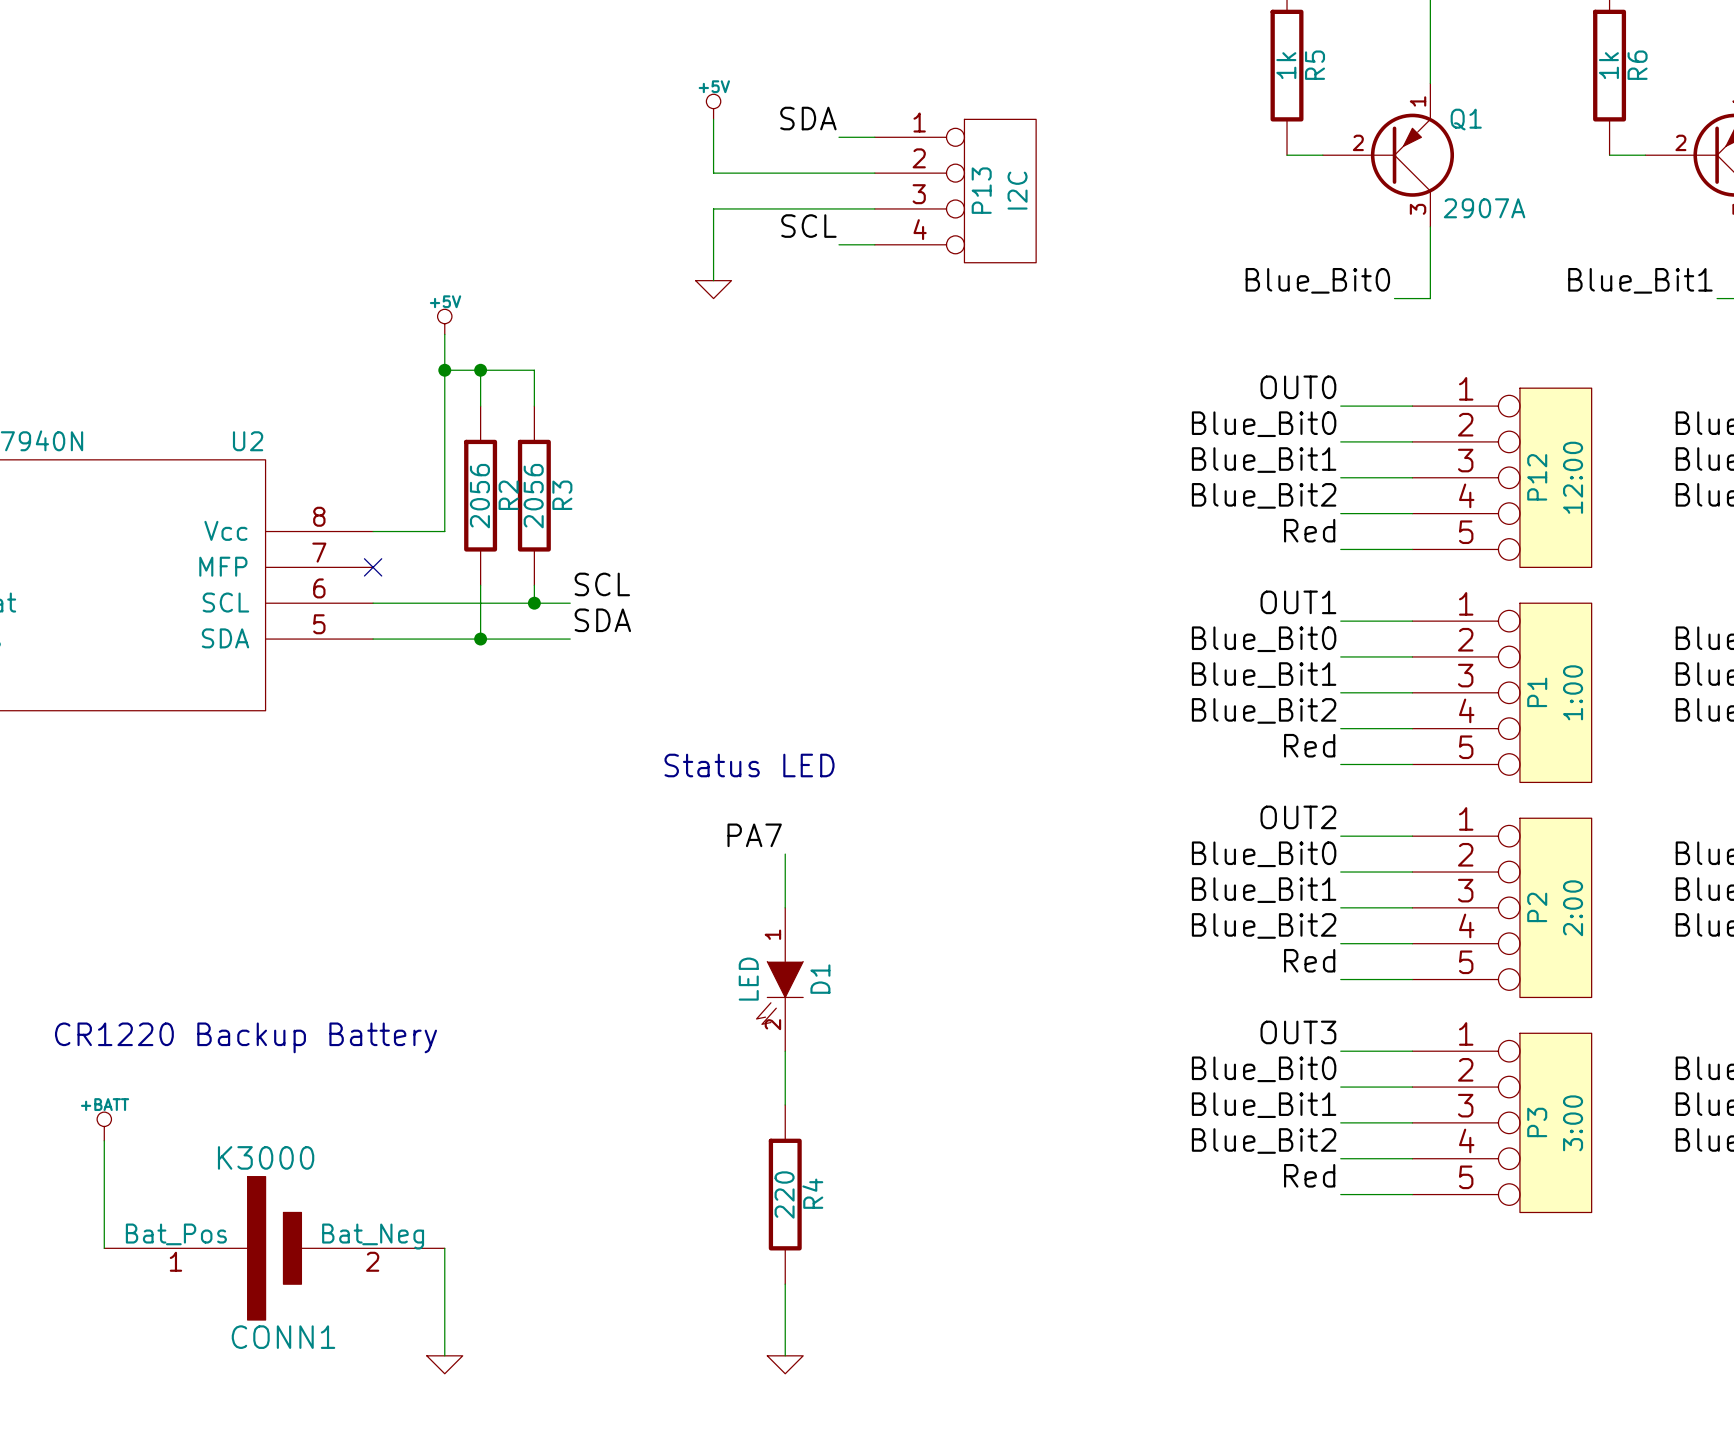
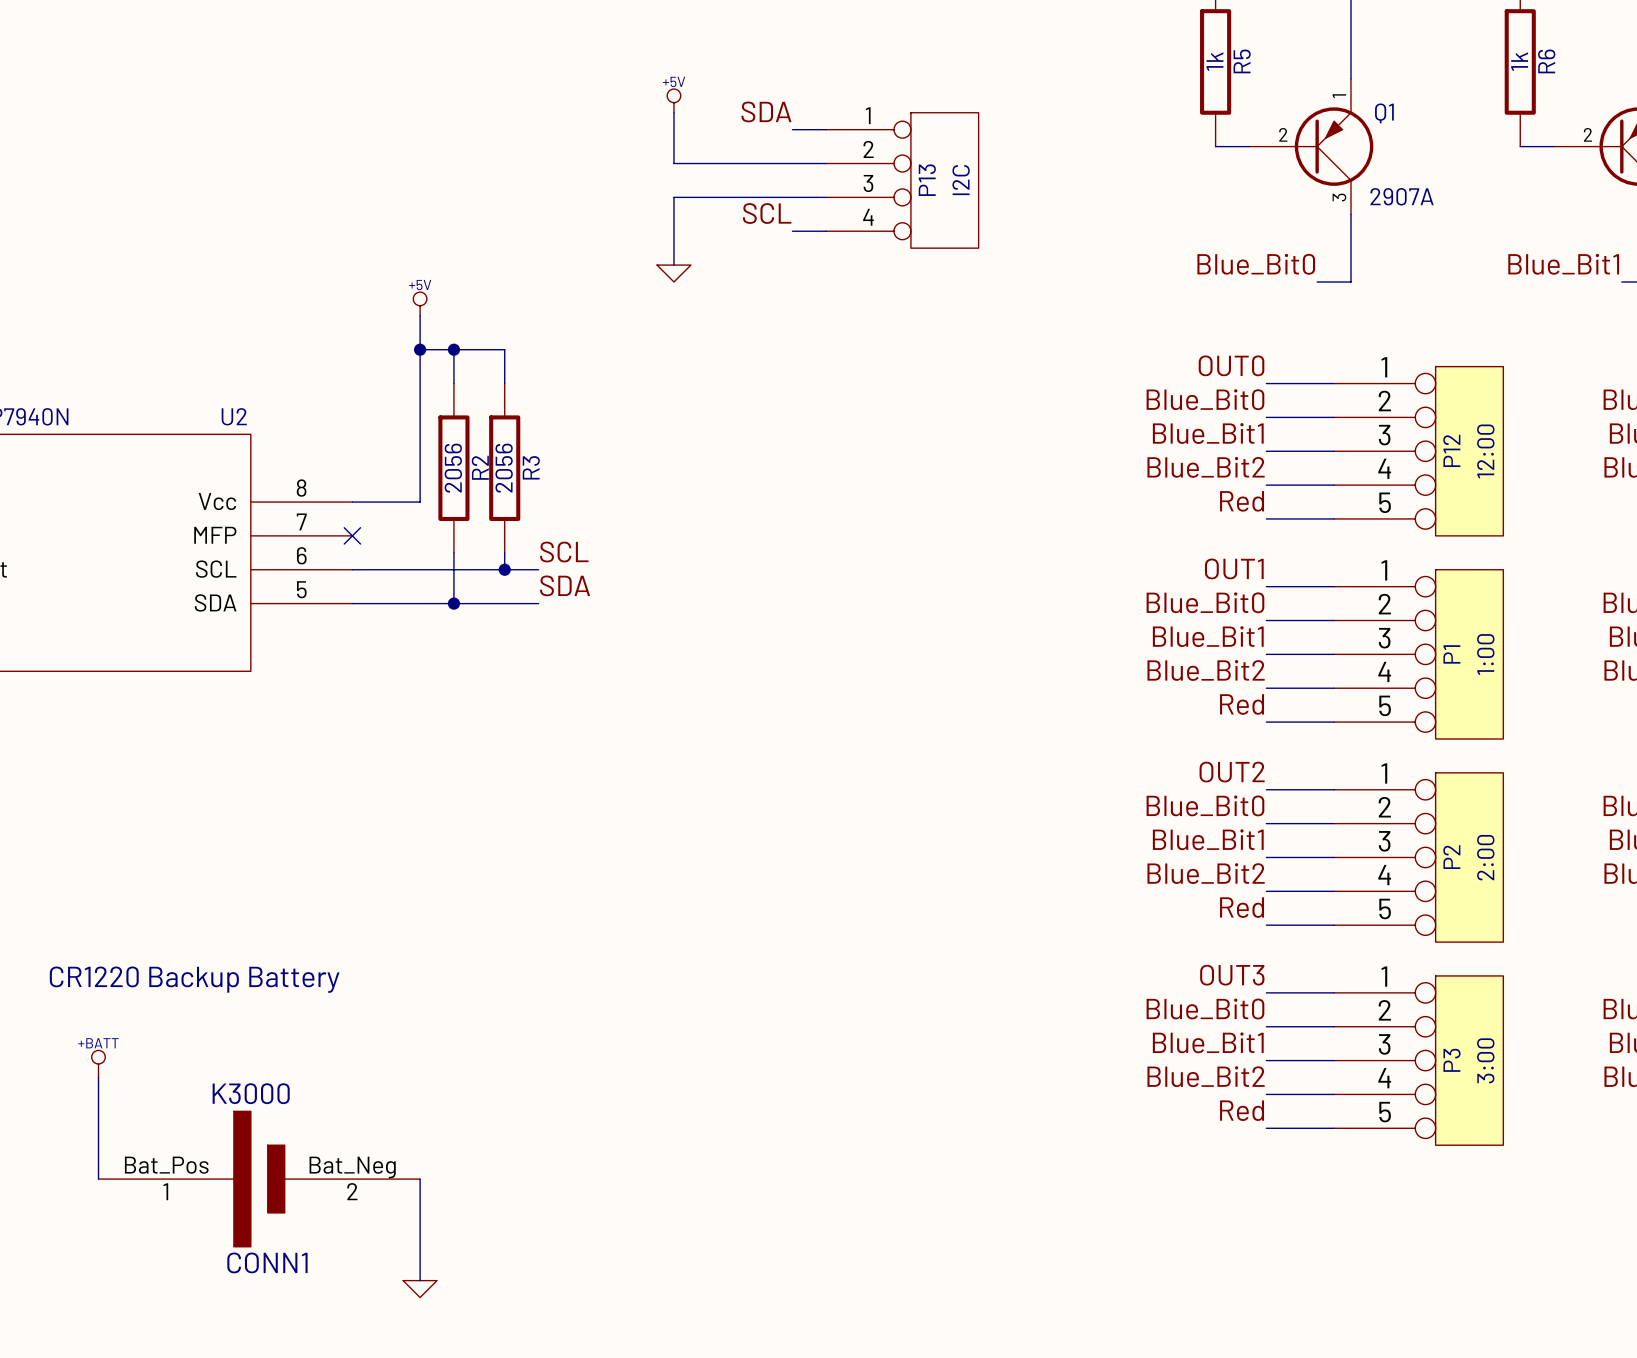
text: Status LED (749, 765) -> none
label: PA7 (754, 835) -> none
wire: (785, 854) (785, 907) -> none
D1: LED (779, 979) -> none
wire: (785, 1051) (785, 1104) -> none
R4: 220 (785, 1194) -> none
wire: (785, 1284) (785, 1355) -> none
power symbol: (785, 1364) -> none

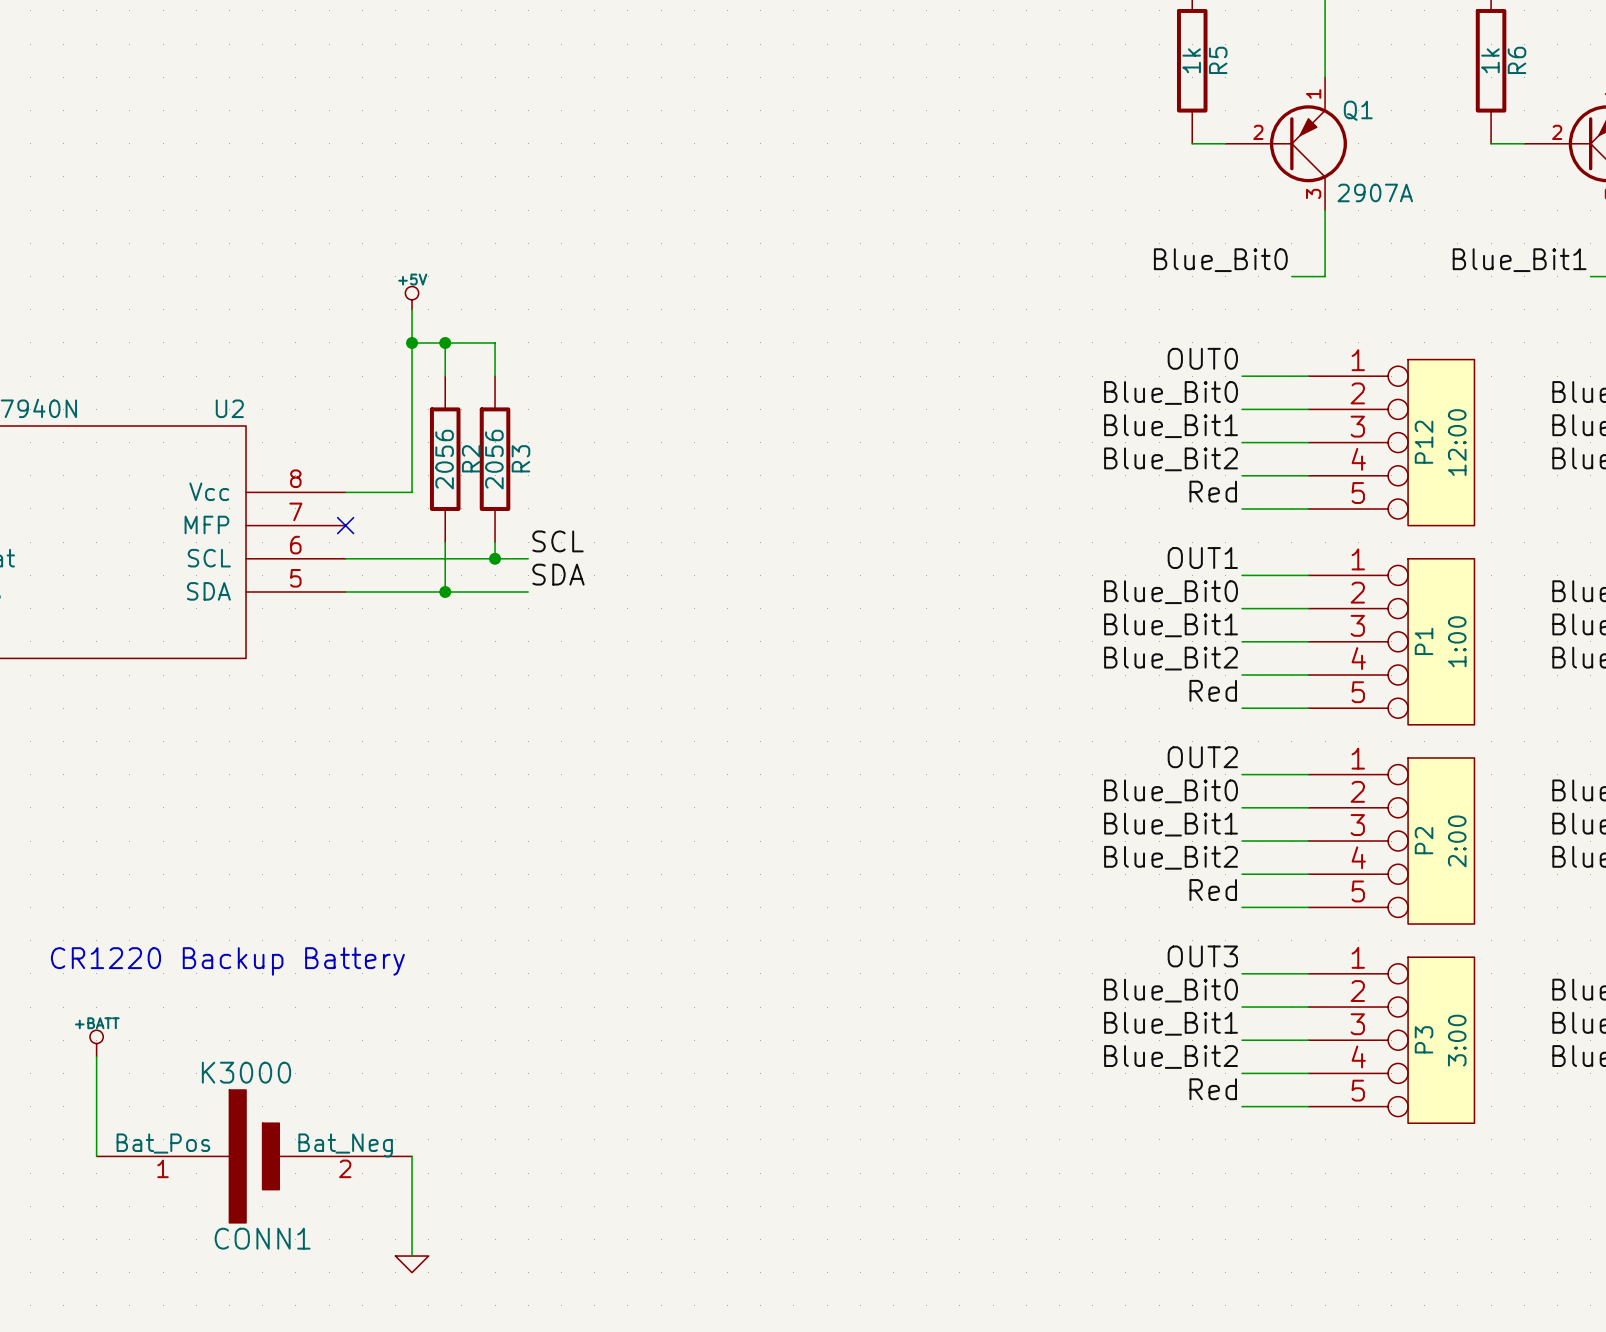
power symbol: +5V (673, 100) -> none
label: SDA (766, 111) -> none
wire: (673, 112) (673, 163) (826, 163) -> none
wire: (792, 129) (826, 129) -> none
P13: I2C (902, 180) -> none
wire: (826, 197) (673, 197) (673, 265) -> none
label: SCL (767, 213) -> none
wire: (792, 231) (826, 231) -> none
power symbol: (673, 273) -> none

